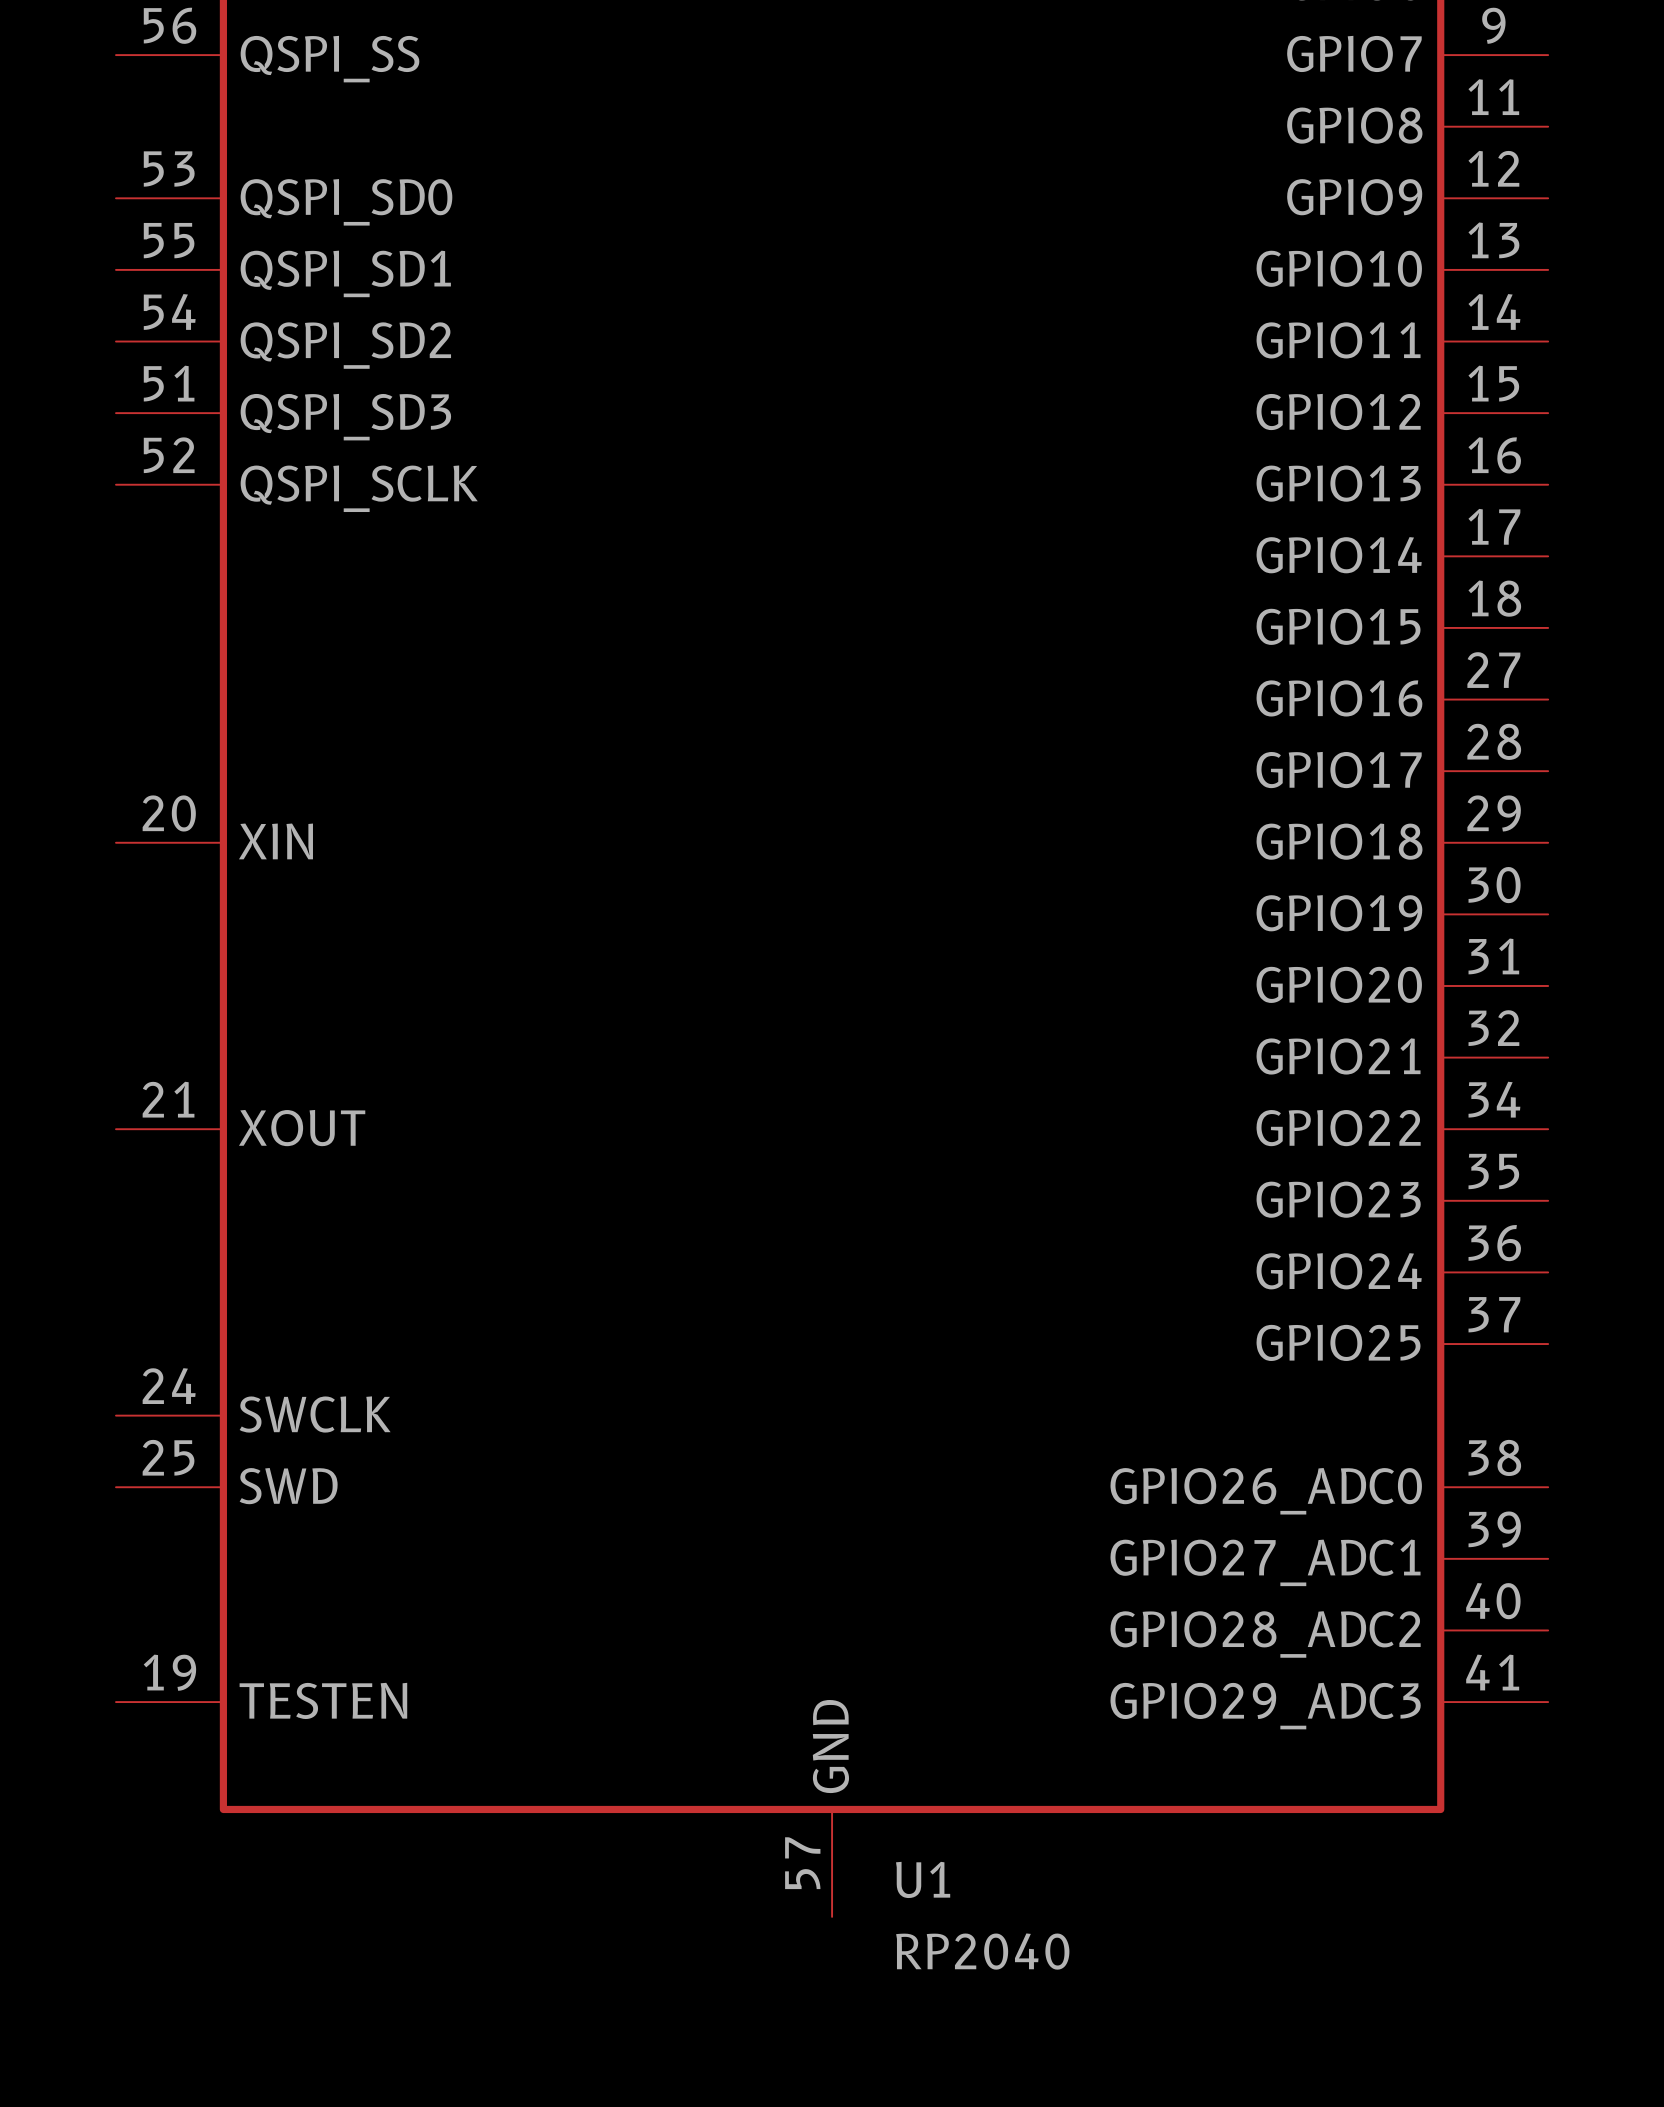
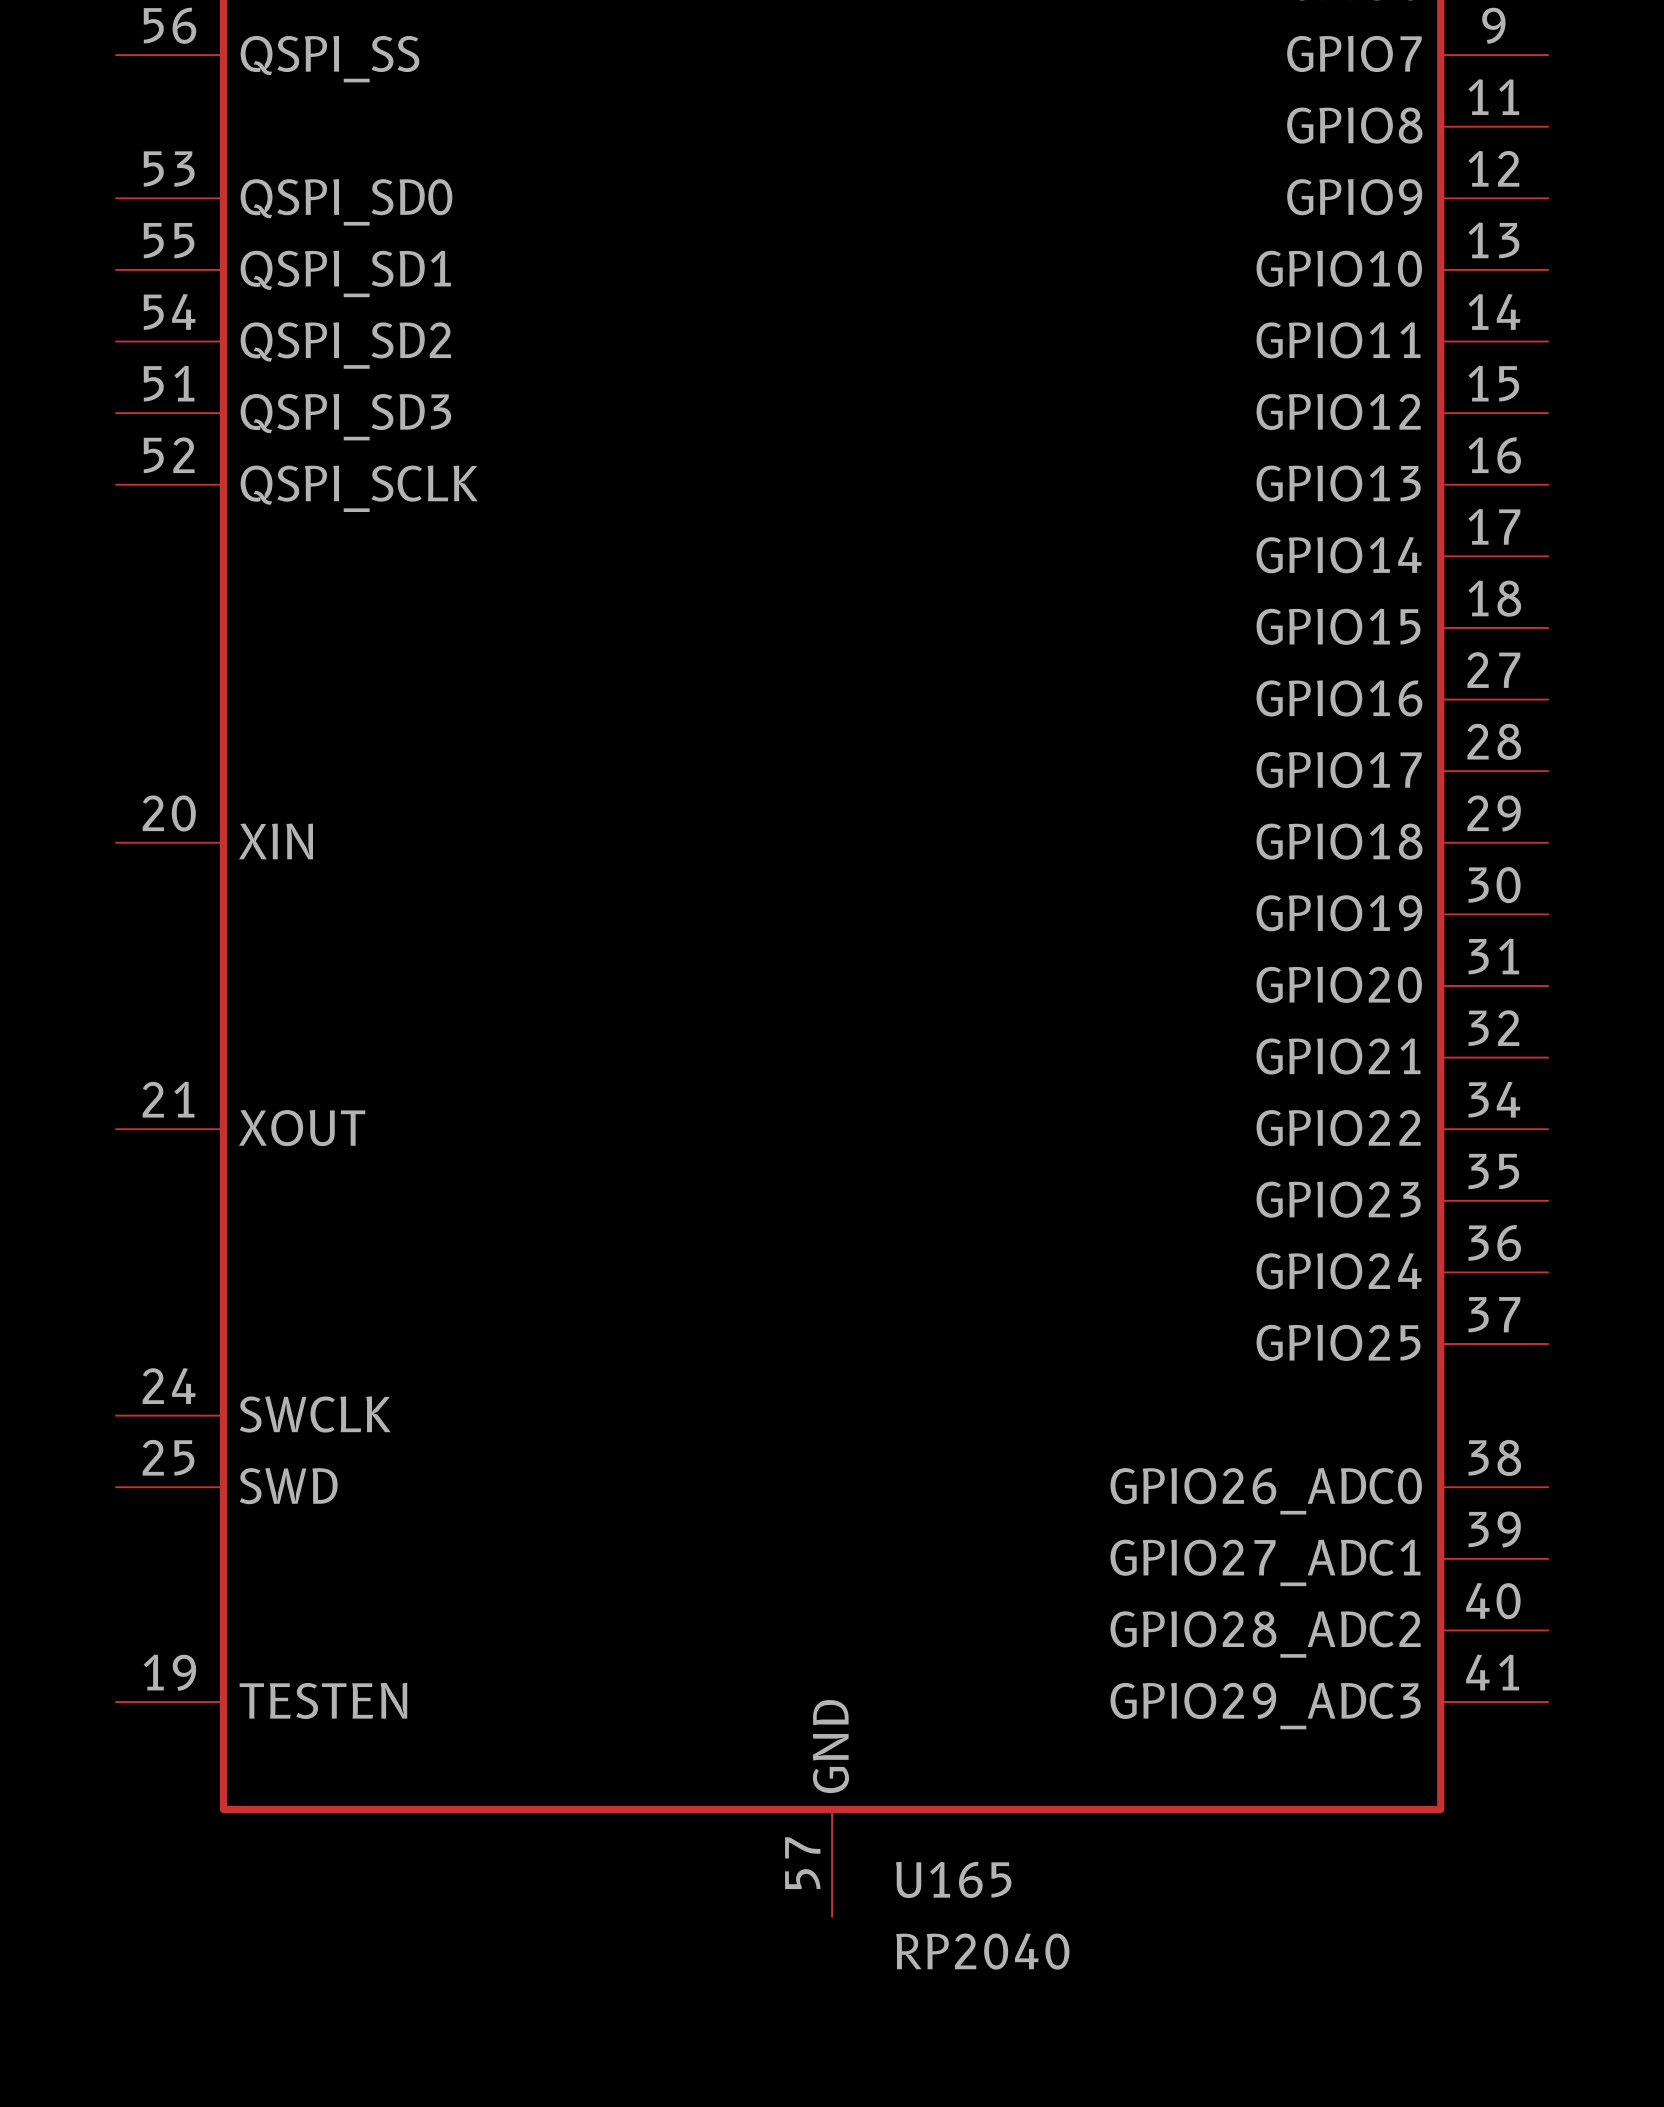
U1 name: U1 (923, 1879) -> U165 (953, 1879)

